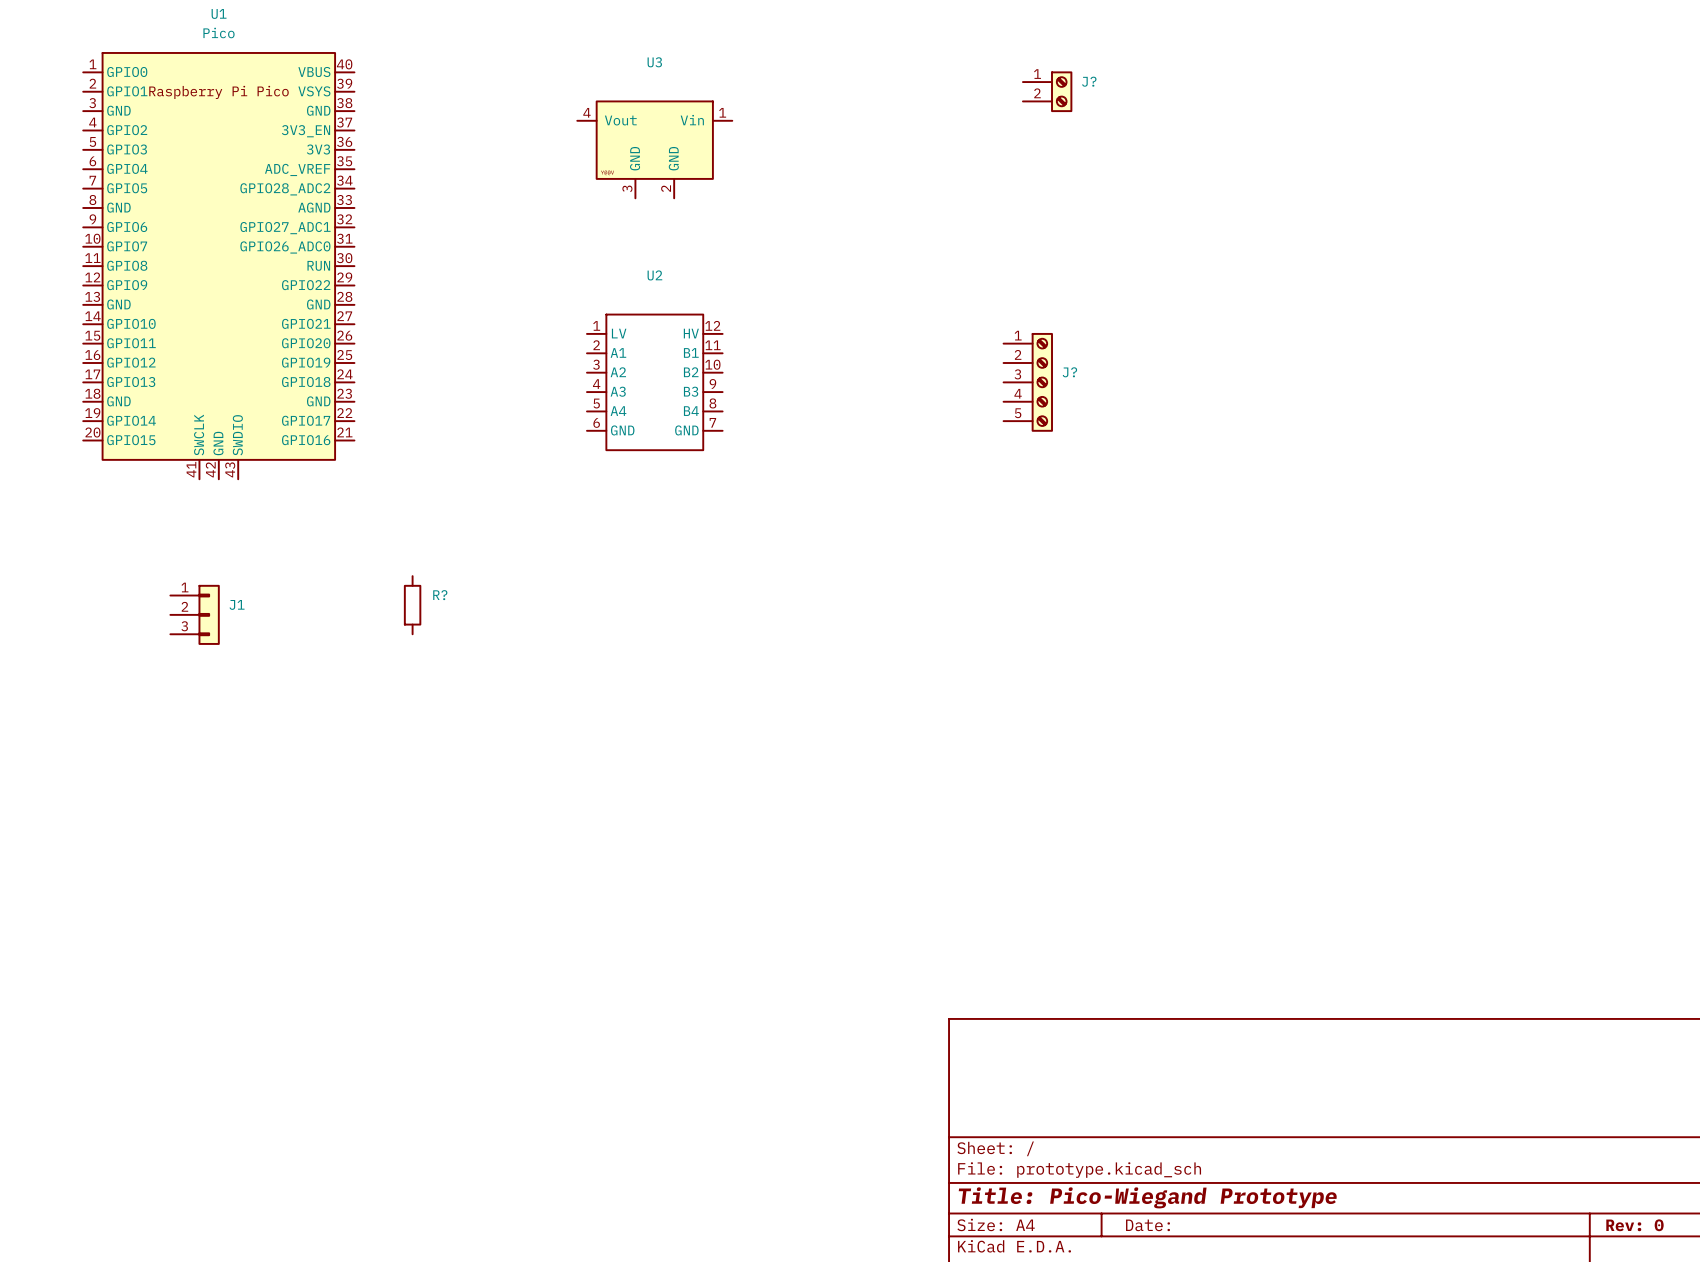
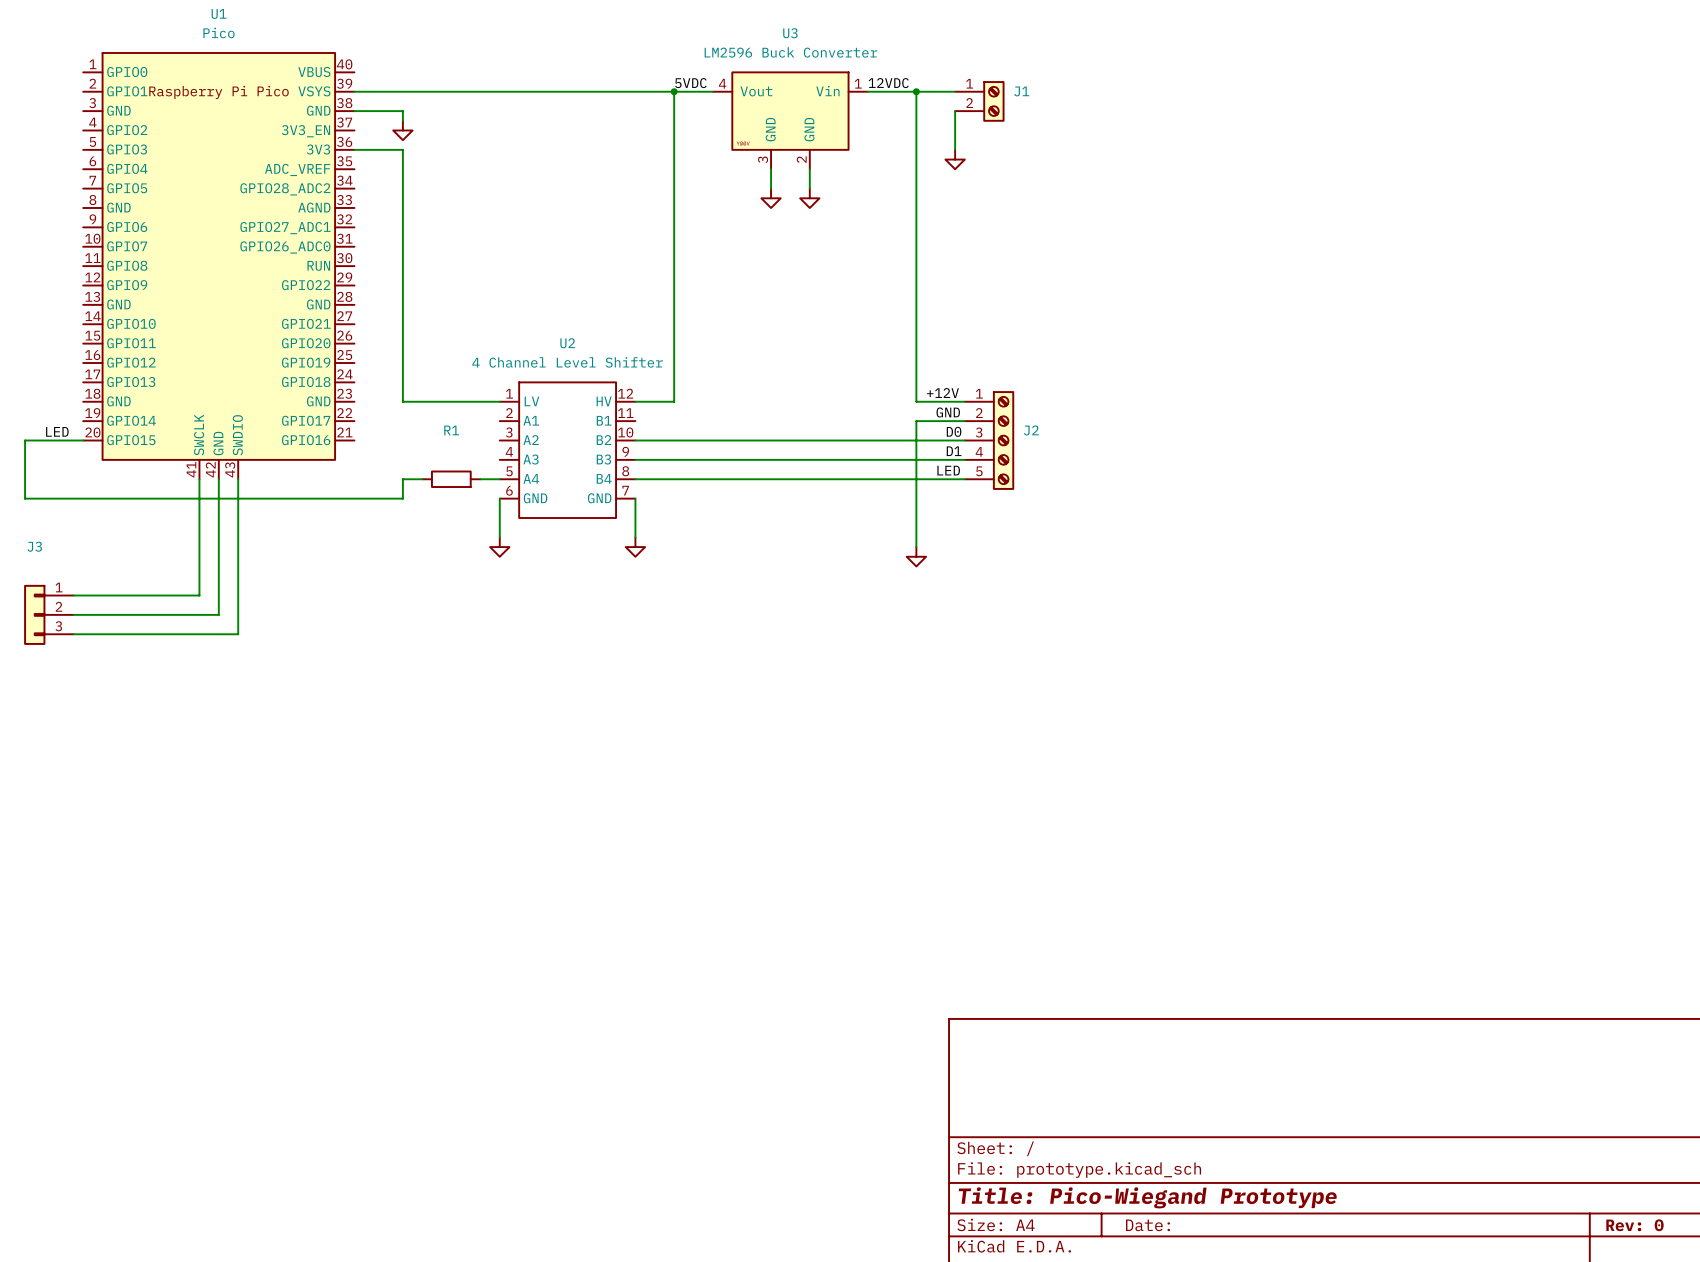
U3 value: none -> LM2596 Buck Converter (790, 52)
label: none -> 5VDC (690, 83)
label: none -> 12VDC (888, 83)
wire: none -> (354, 91) (712, 91)
wire: none -> (674, 91) (674, 401) (635, 401)
junction: none -> (674, 91)
wire: none -> (867, 91) (955, 91)
wire: none -> (916, 91) (916, 401) (964, 401)
junction: none -> (916, 91)
J?: (1047, 91) -> none
wire: none -> (354, 111) (402, 111) (402, 120)
wire: none -> (955, 111) (955, 149)
power symbol: none -> (402, 130)
wire: none -> (354, 149) (402, 149) (402, 401) (499, 401)
U3 position: (654, 149) -> (790, 120)
power symbol: none -> (955, 159)
wire: none -> (771, 169) (771, 188)
wire: none -> (809, 169) (809, 188)
power symbol: none -> (771, 198)
power symbol: none -> (809, 198)
U2 value: none -> 4 Channel Level Shifter (567, 362)
U2 position: (654, 382) -> (567, 450)
J?: (1028, 382) -> none
label: none -> +12V (942, 393)
label: none -> GND (948, 412)
wire: none -> (964, 421) (916, 421) (916, 547)
label: none -> LED (57, 431)
label: none -> D0 (954, 431)
wire: none -> (83, 440) (25, 440) (25, 498) (402, 498) (402, 479) (422, 479)
wire: none -> (635, 440) (964, 440)
J2: none -> (989, 440)
label: none -> D1 (954, 451)
wire: none -> (635, 459) (964, 459)
label: none -> LED (948, 470)
wire: none -> (199, 479) (199, 595) (73, 595)
wire: none -> (218, 479) (218, 614) (73, 614)
wire: none -> (238, 479) (238, 634) (73, 634)
R1: none -> (451, 479)
wire: none -> (480, 479) (499, 479)
wire: none -> (635, 479) (964, 479)
wire: none -> (499, 498) (499, 537)
wire: none -> (635, 498) (635, 537)
power symbol: none -> (499, 547)
power symbol: none -> (635, 547)
power symbol: none -> (916, 556)
J1 symbol: [170, 584, 220, 645] -> [955, 81, 1005, 122]
R?: (412, 605) -> none
J3: none -> (48, 614)

